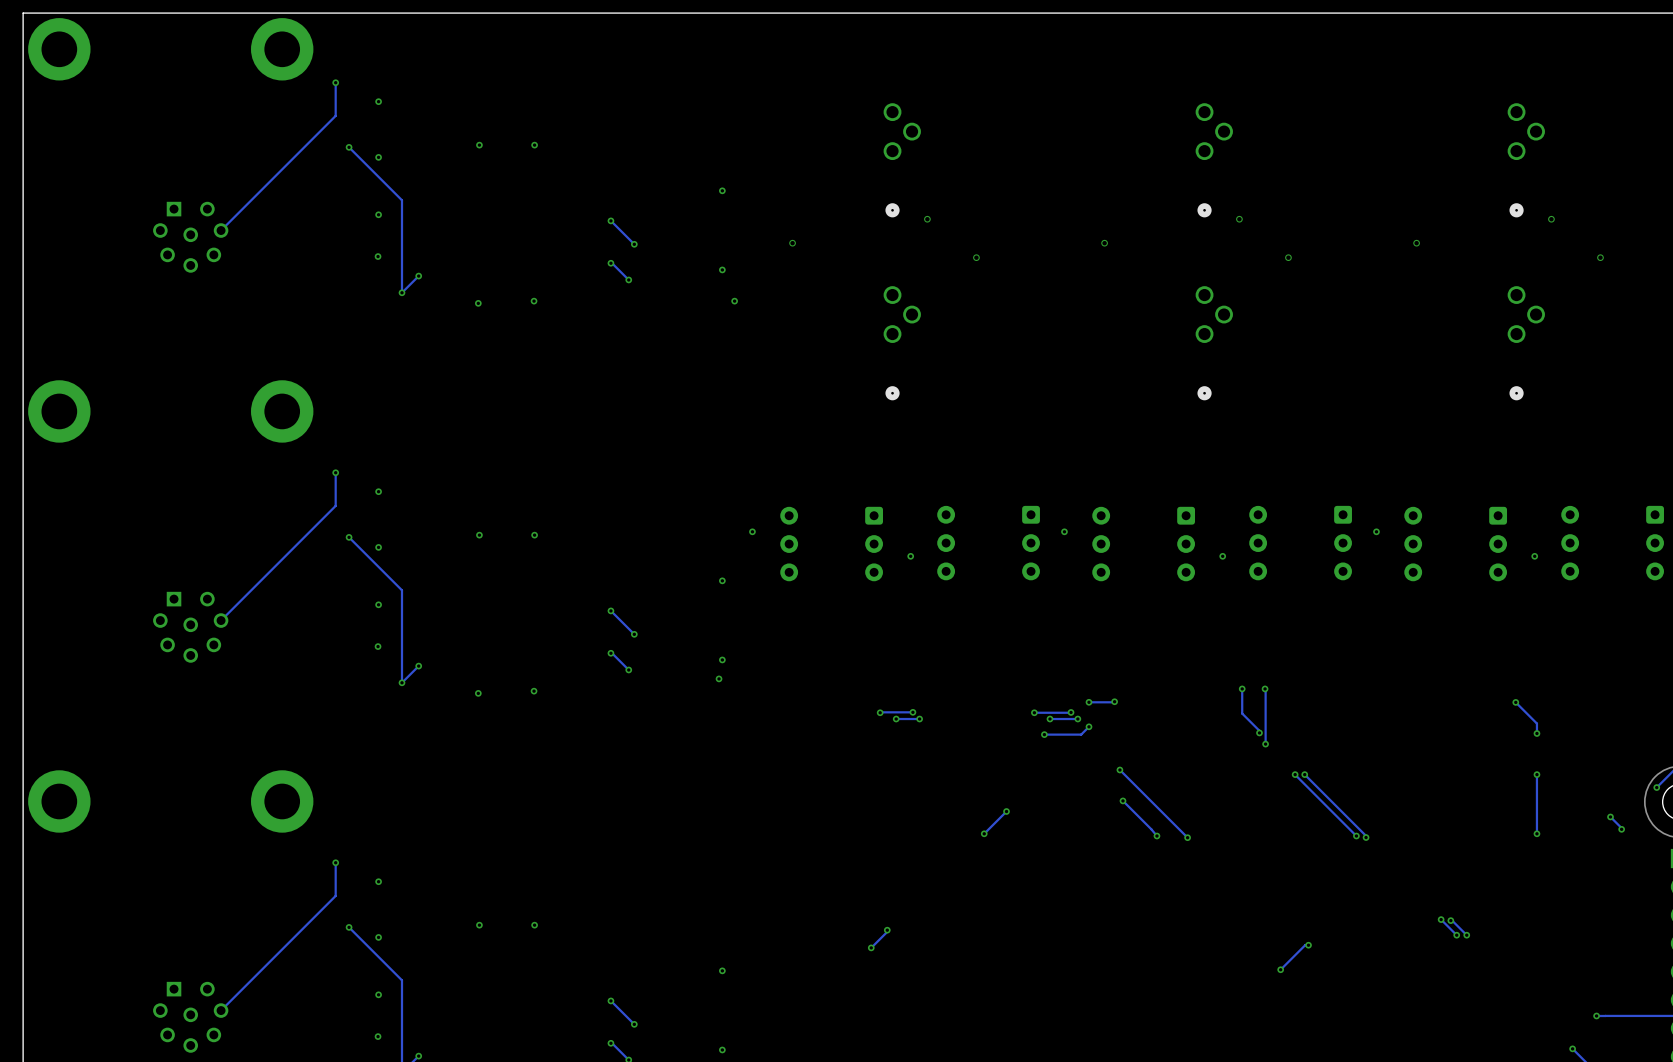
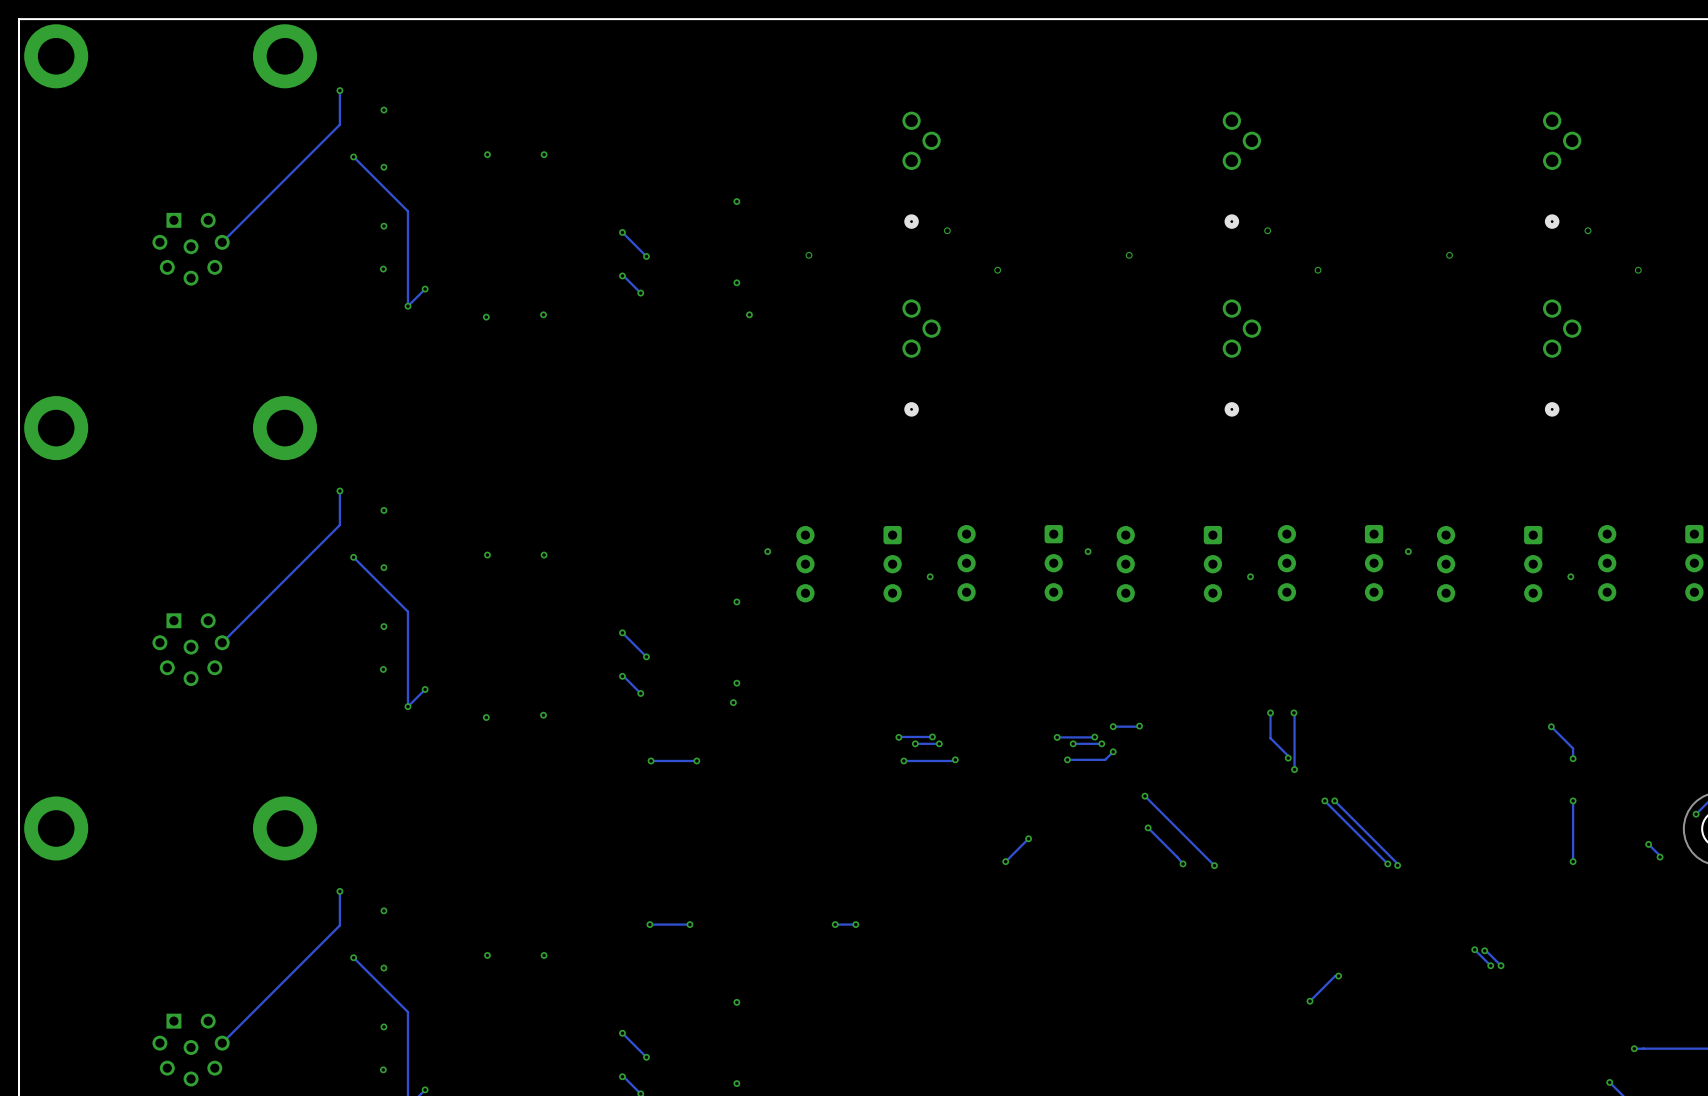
track: none -> (955, 759) (903, 760)
via: none -> (955, 759)
via: none -> (651, 760)
track: none -> (696, 760) (651, 760)
via: none -> (696, 760)
via: none -> (903, 760)
via: none -> (649, 924)
track: none -> (689, 924) (649, 924)
via: none -> (689, 924)
via: none -> (835, 924)
track: none -> (855, 924) (835, 924)
via: none -> (855, 924)
track: (887, 930) (871, 947) -> none
via: (887, 930) -> none
via: (871, 947) -> none

